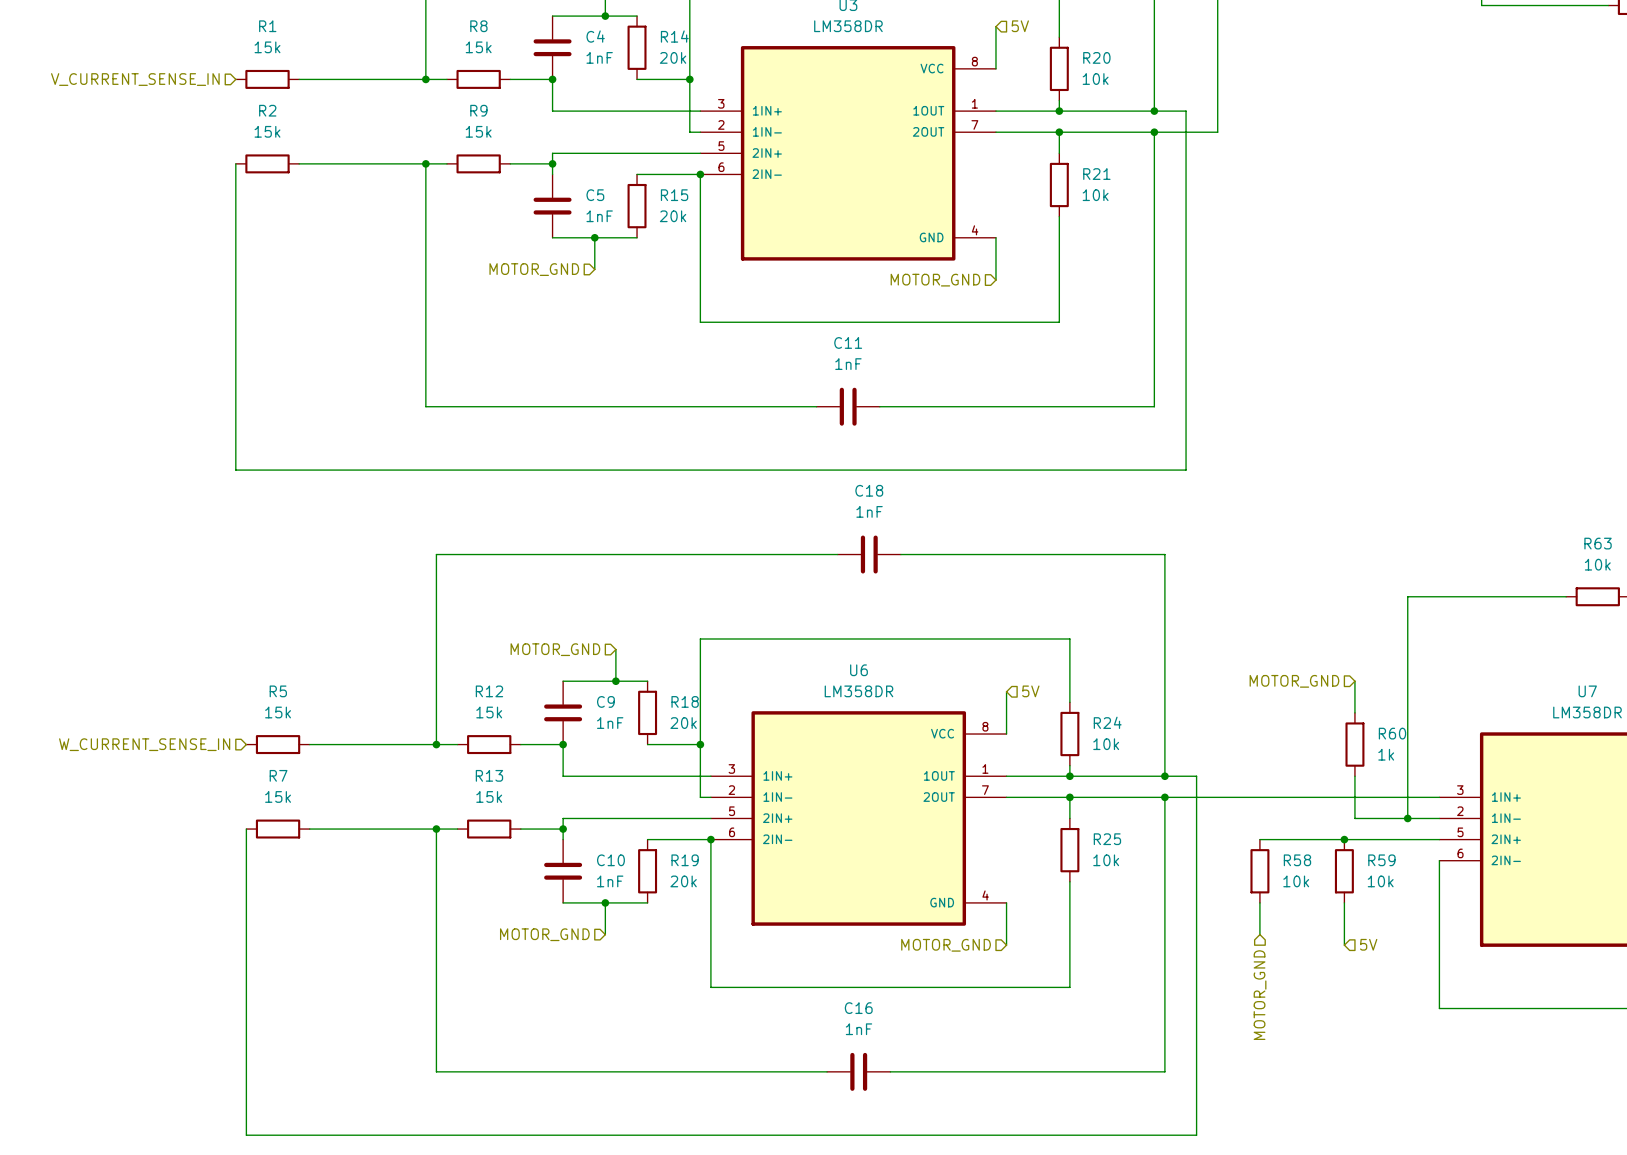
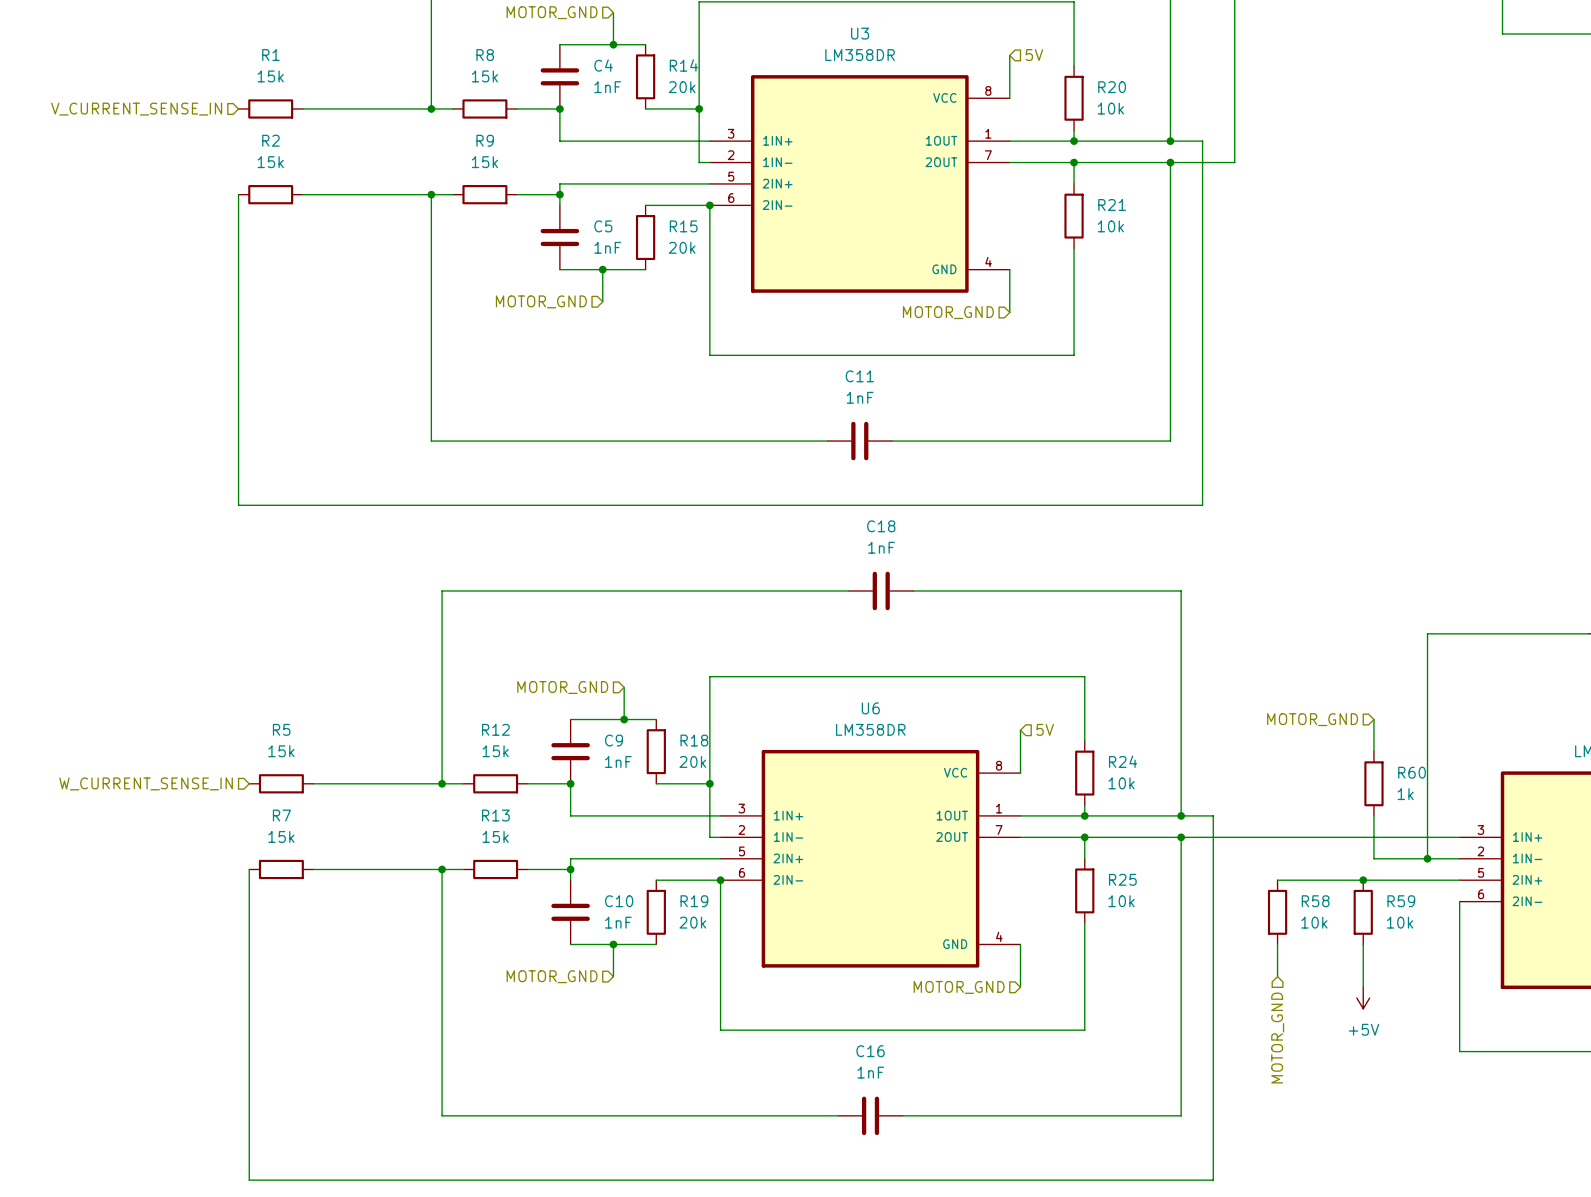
hierarchical label: 5V (1368, 944) -> none
power symbol: none -> +5V (1363, 998)

